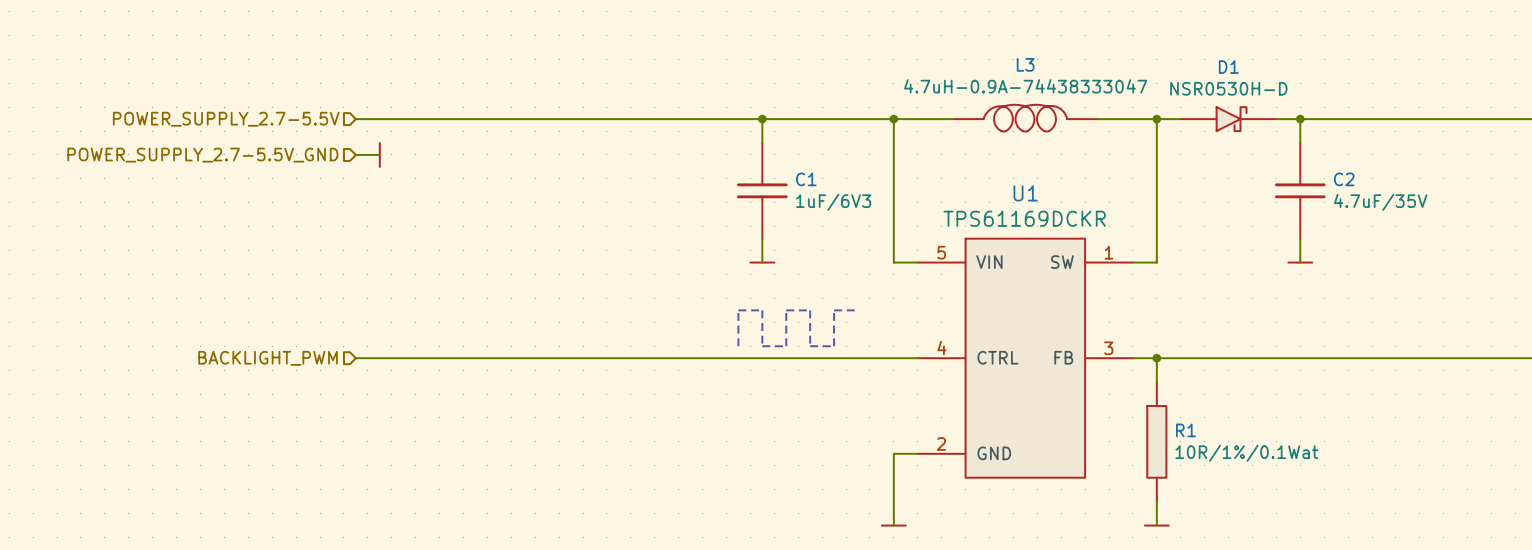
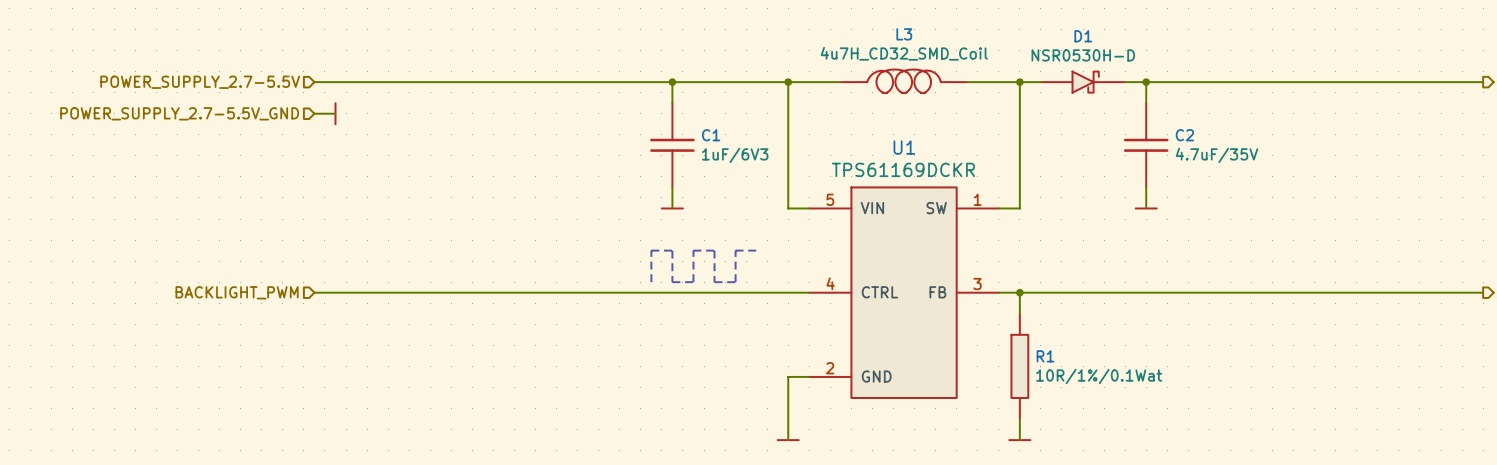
L3 value: 4.7uH-0.9A-74438333047 (1025, 86) -> 4u7H_CD32_SMD_Coil (904, 53)

